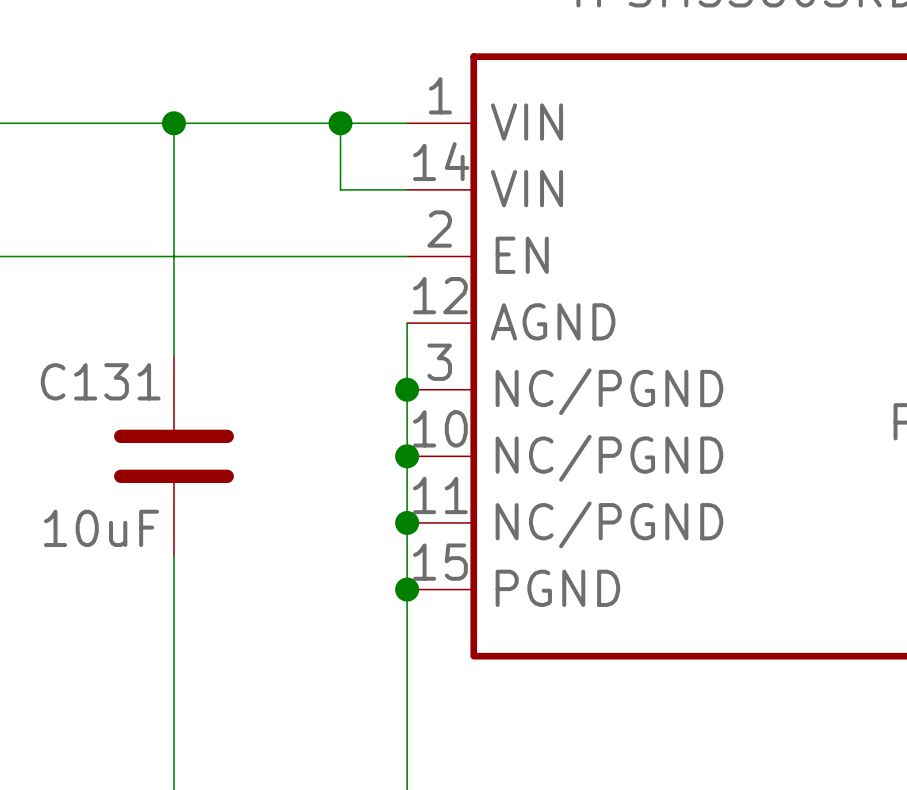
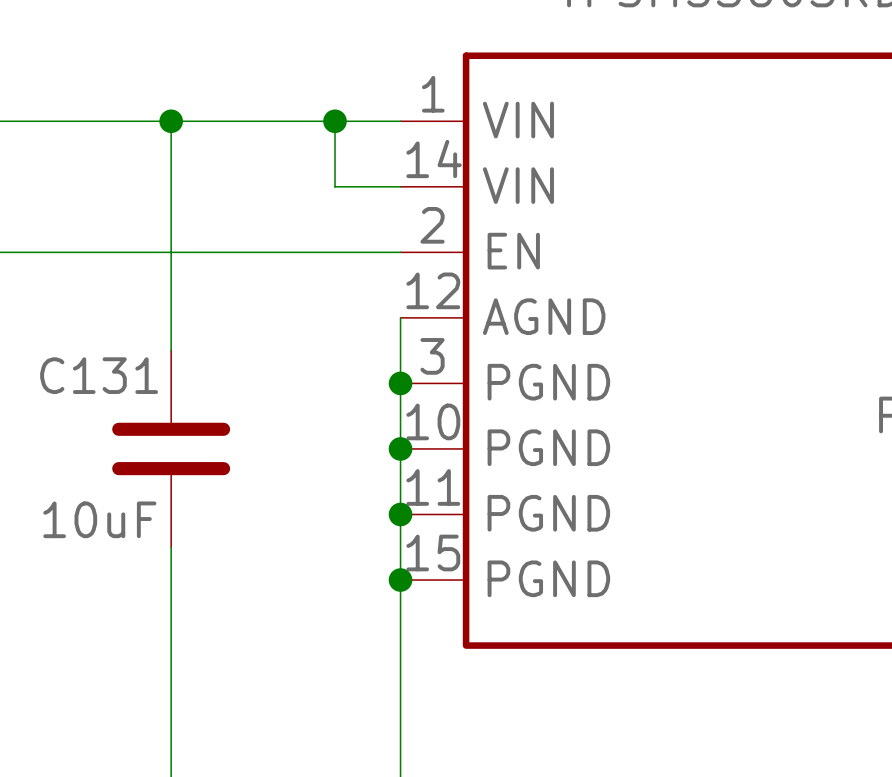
part pin name: NC/PGND (609, 391) -> PGND (548, 382)
part pin name: NC/PGND (609, 458) -> PGND (548, 447)
part pin name: NC/PGND (609, 524) -> PGND (548, 513)

